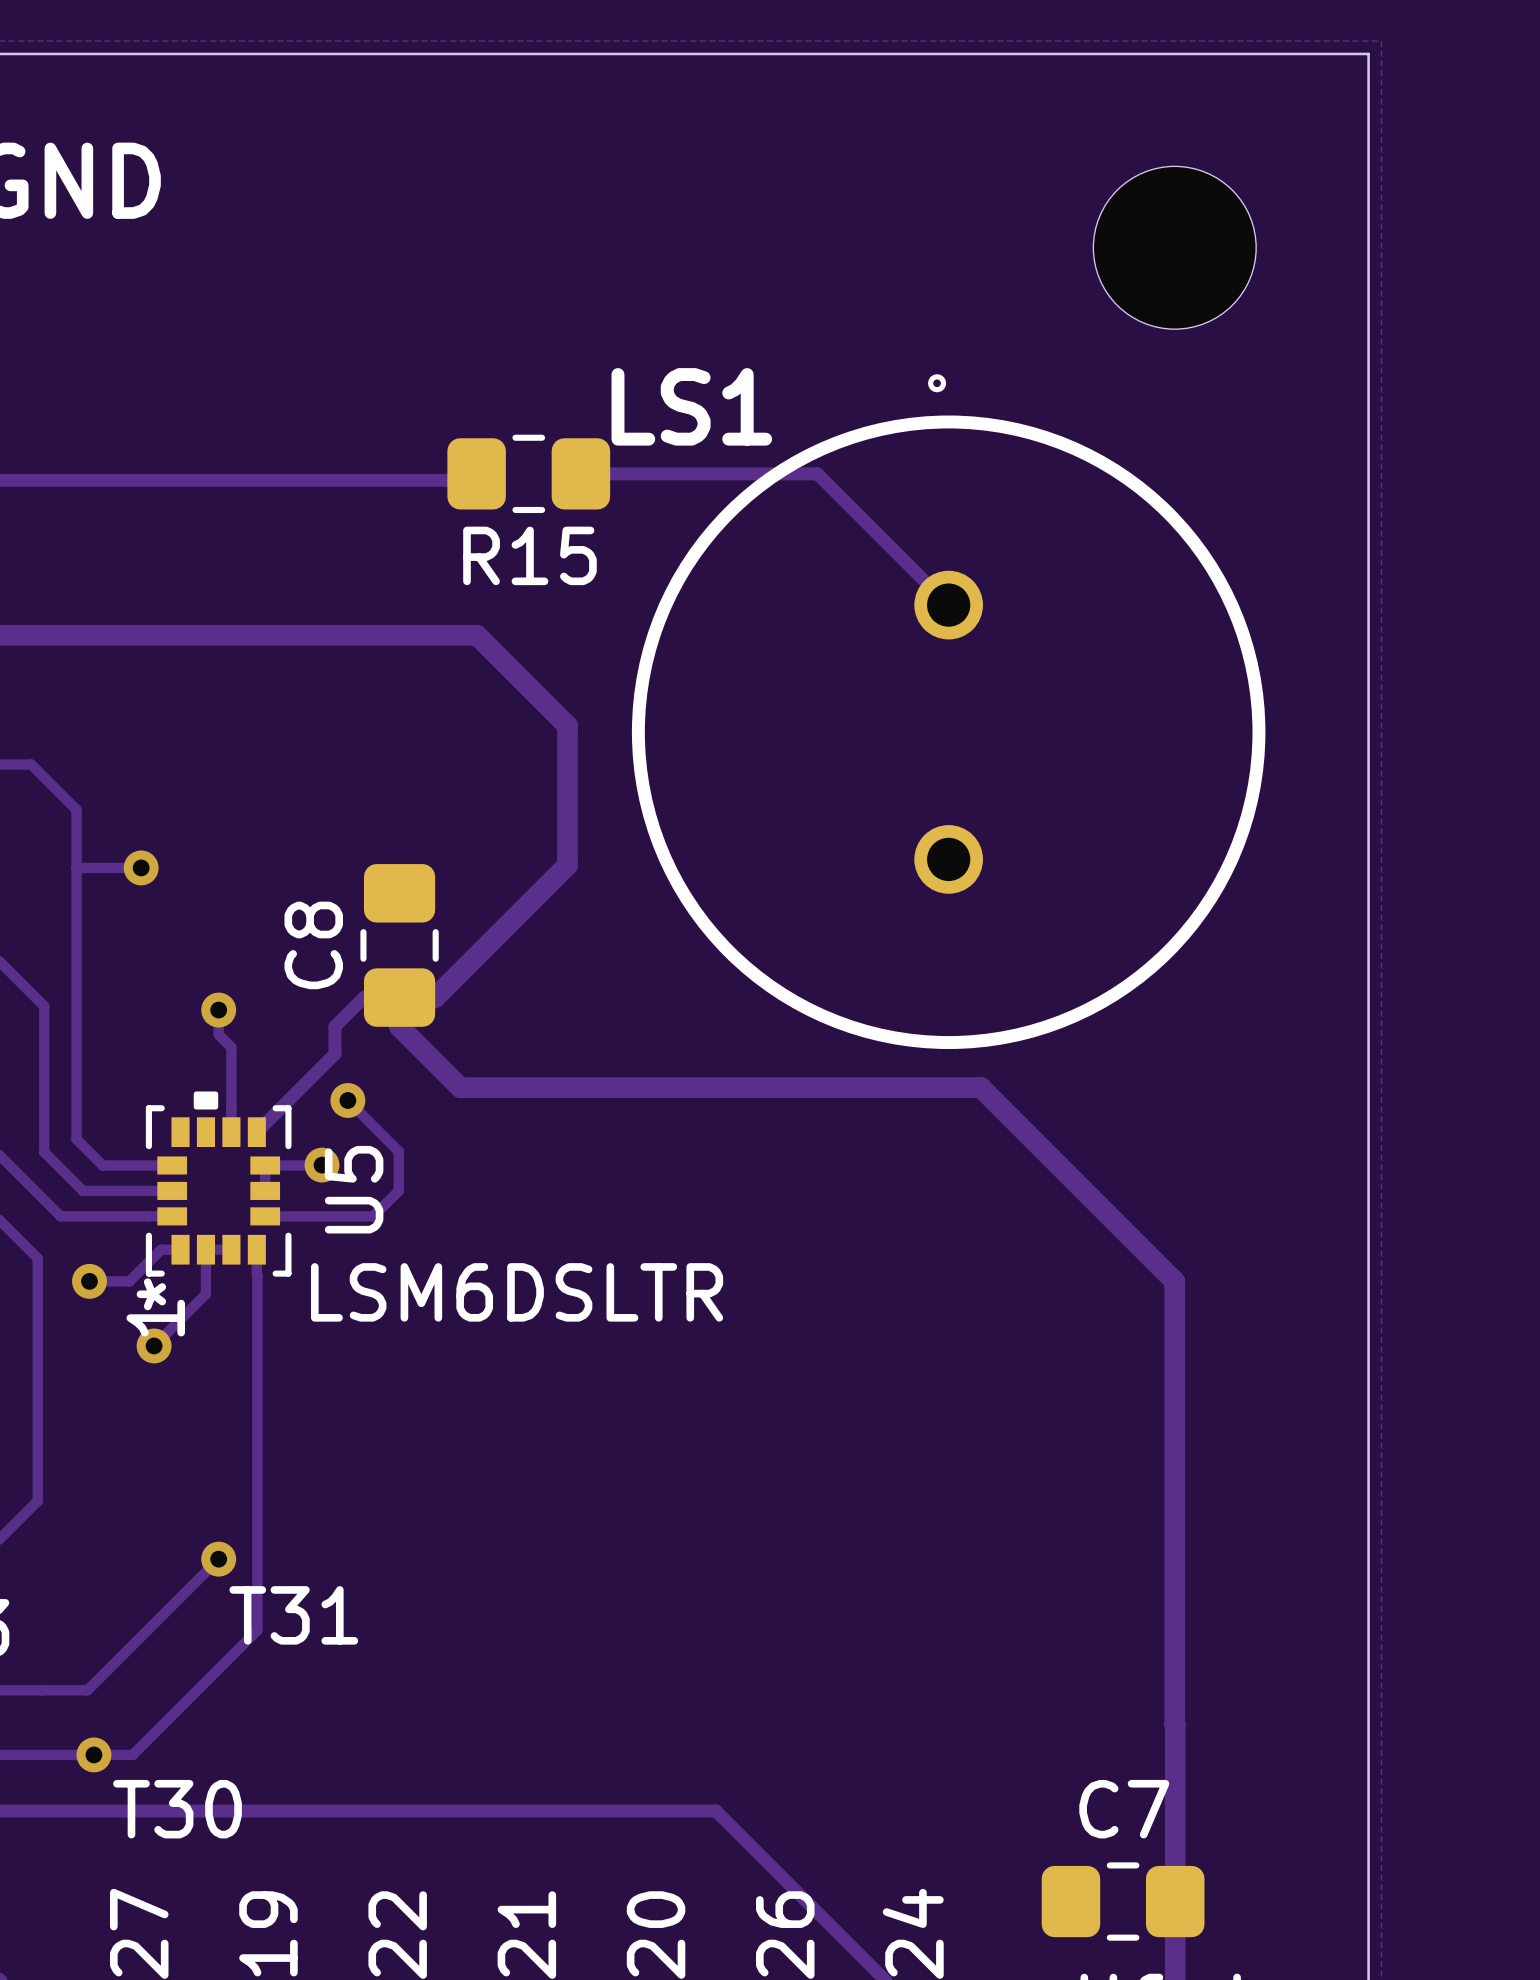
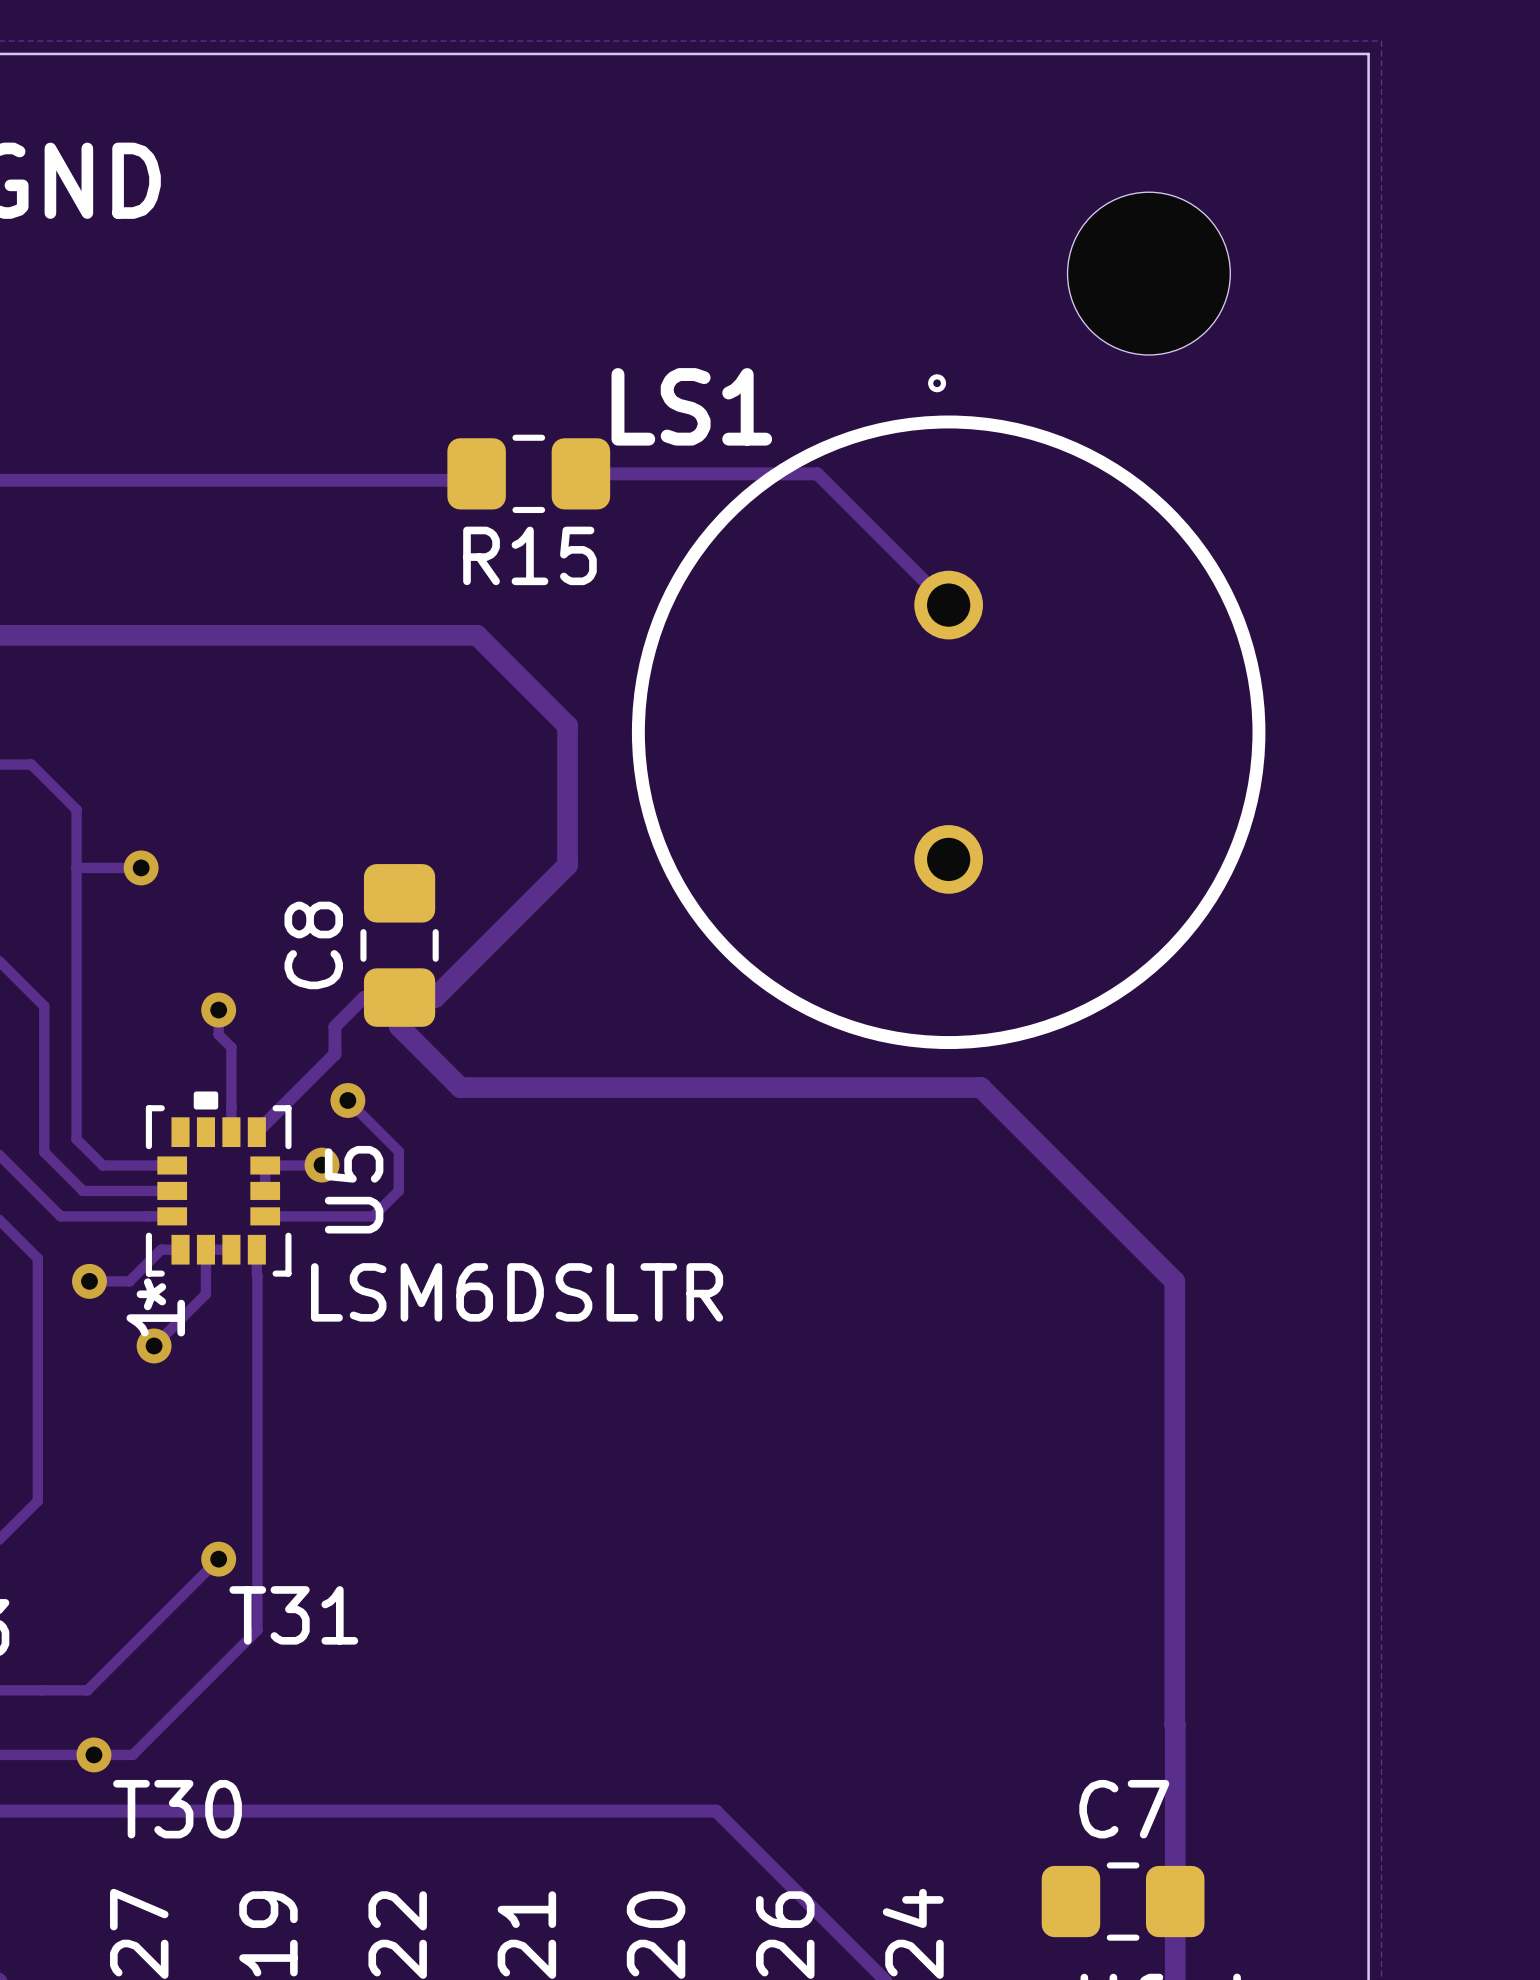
part position: (1174, 247) -> (1148, 273)

